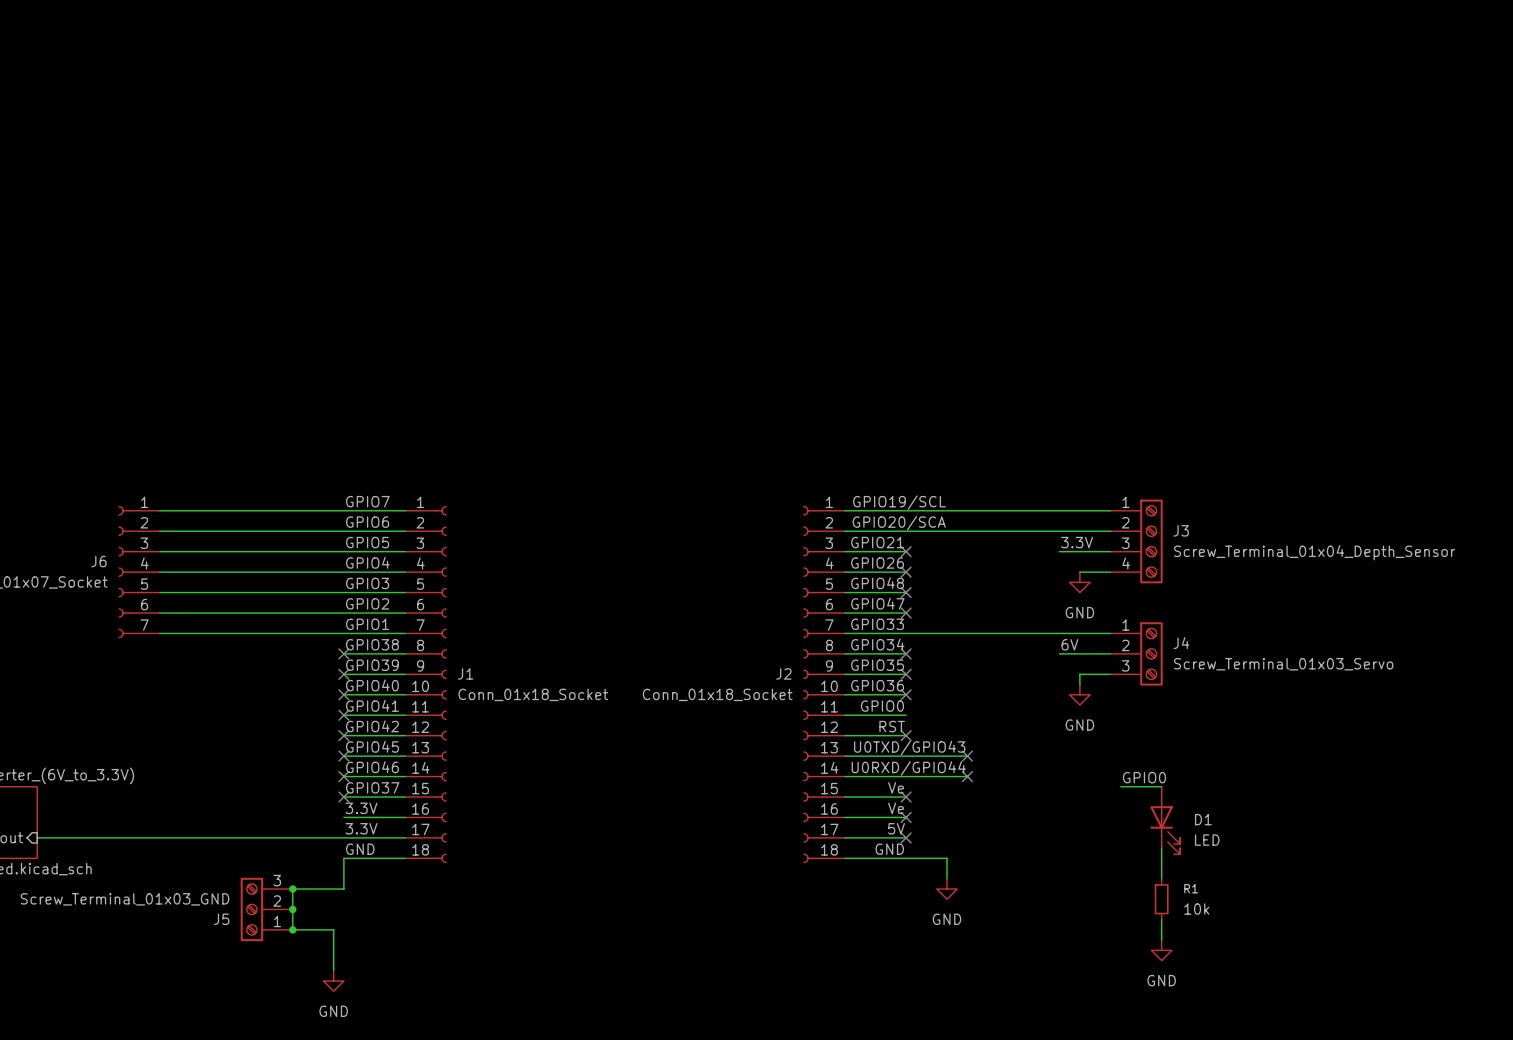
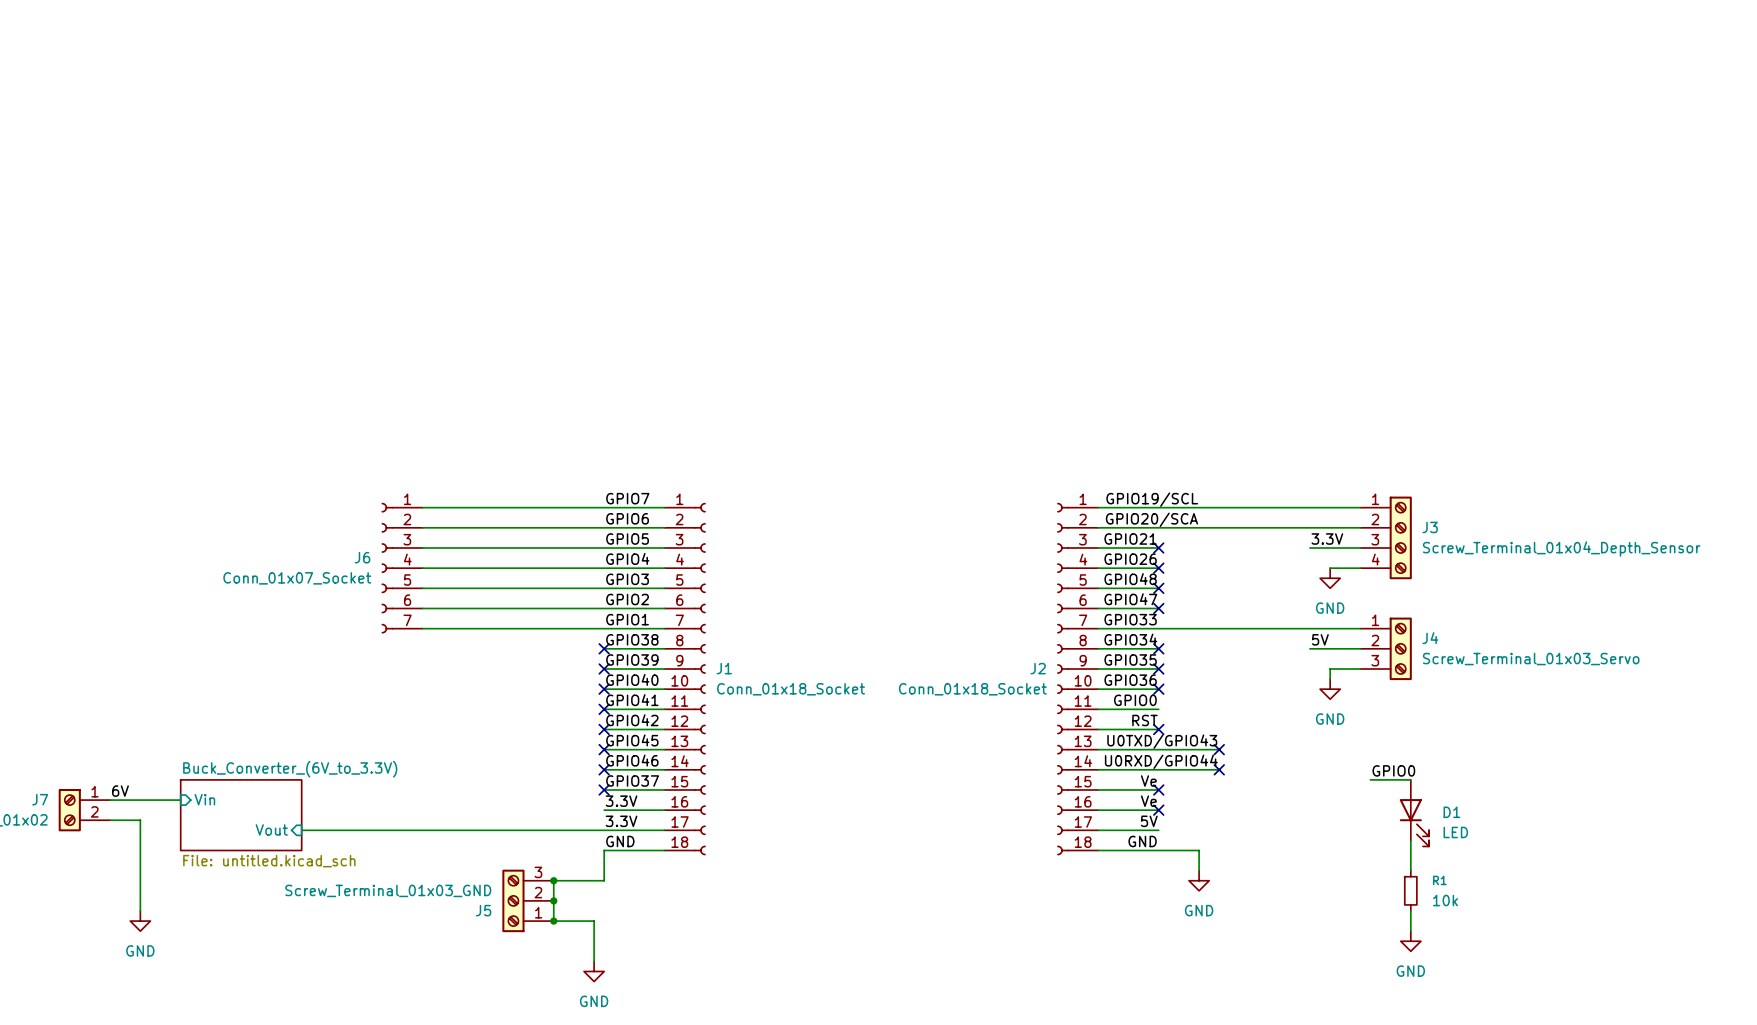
label: 6V (1069, 644) -> 5V (1320, 639)
no-connect mark: (906, 837) -> none

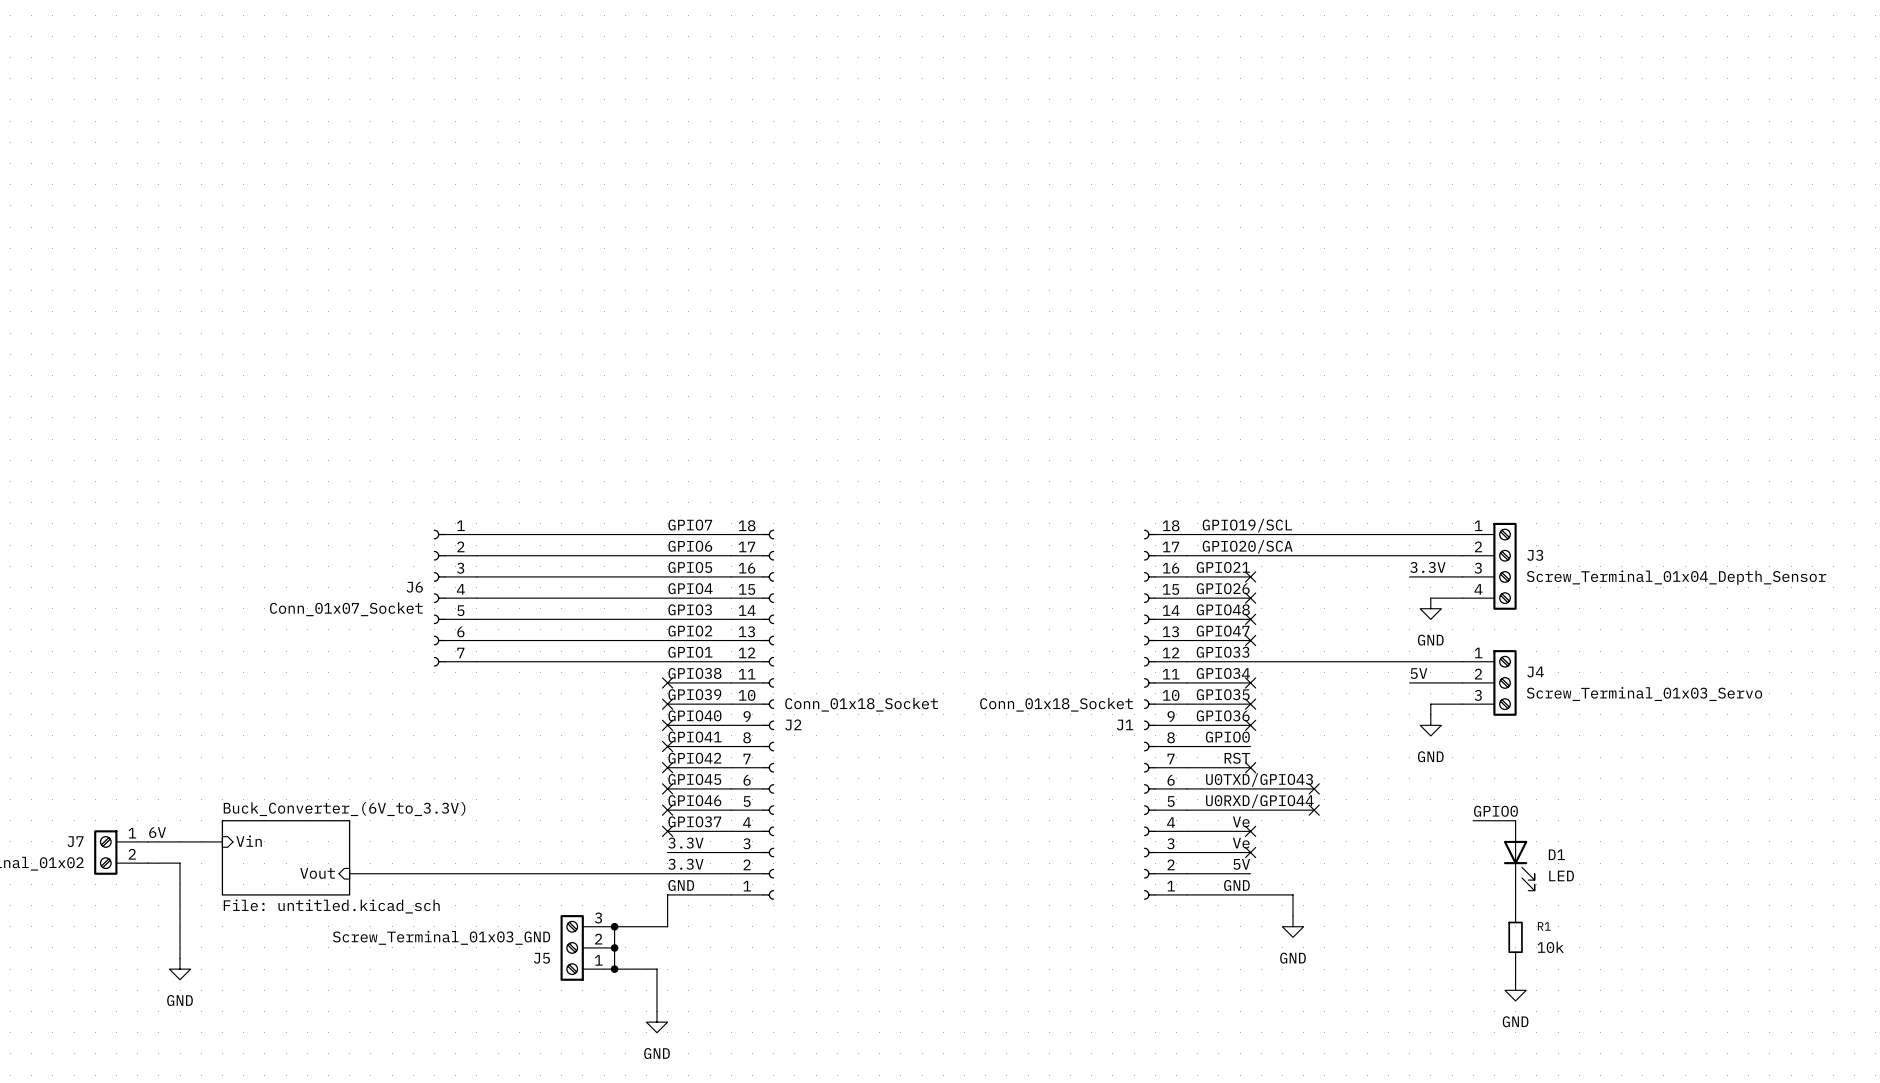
J1 position: (685, 679) -> (1165, 714)
J1 rotation: 0° (699, 679) -> 180° (1149, 714)
J2 rotation: 0° (1062, 679) -> 180° (768, 714)
J2 position: (1077, 679) -> (752, 714)

